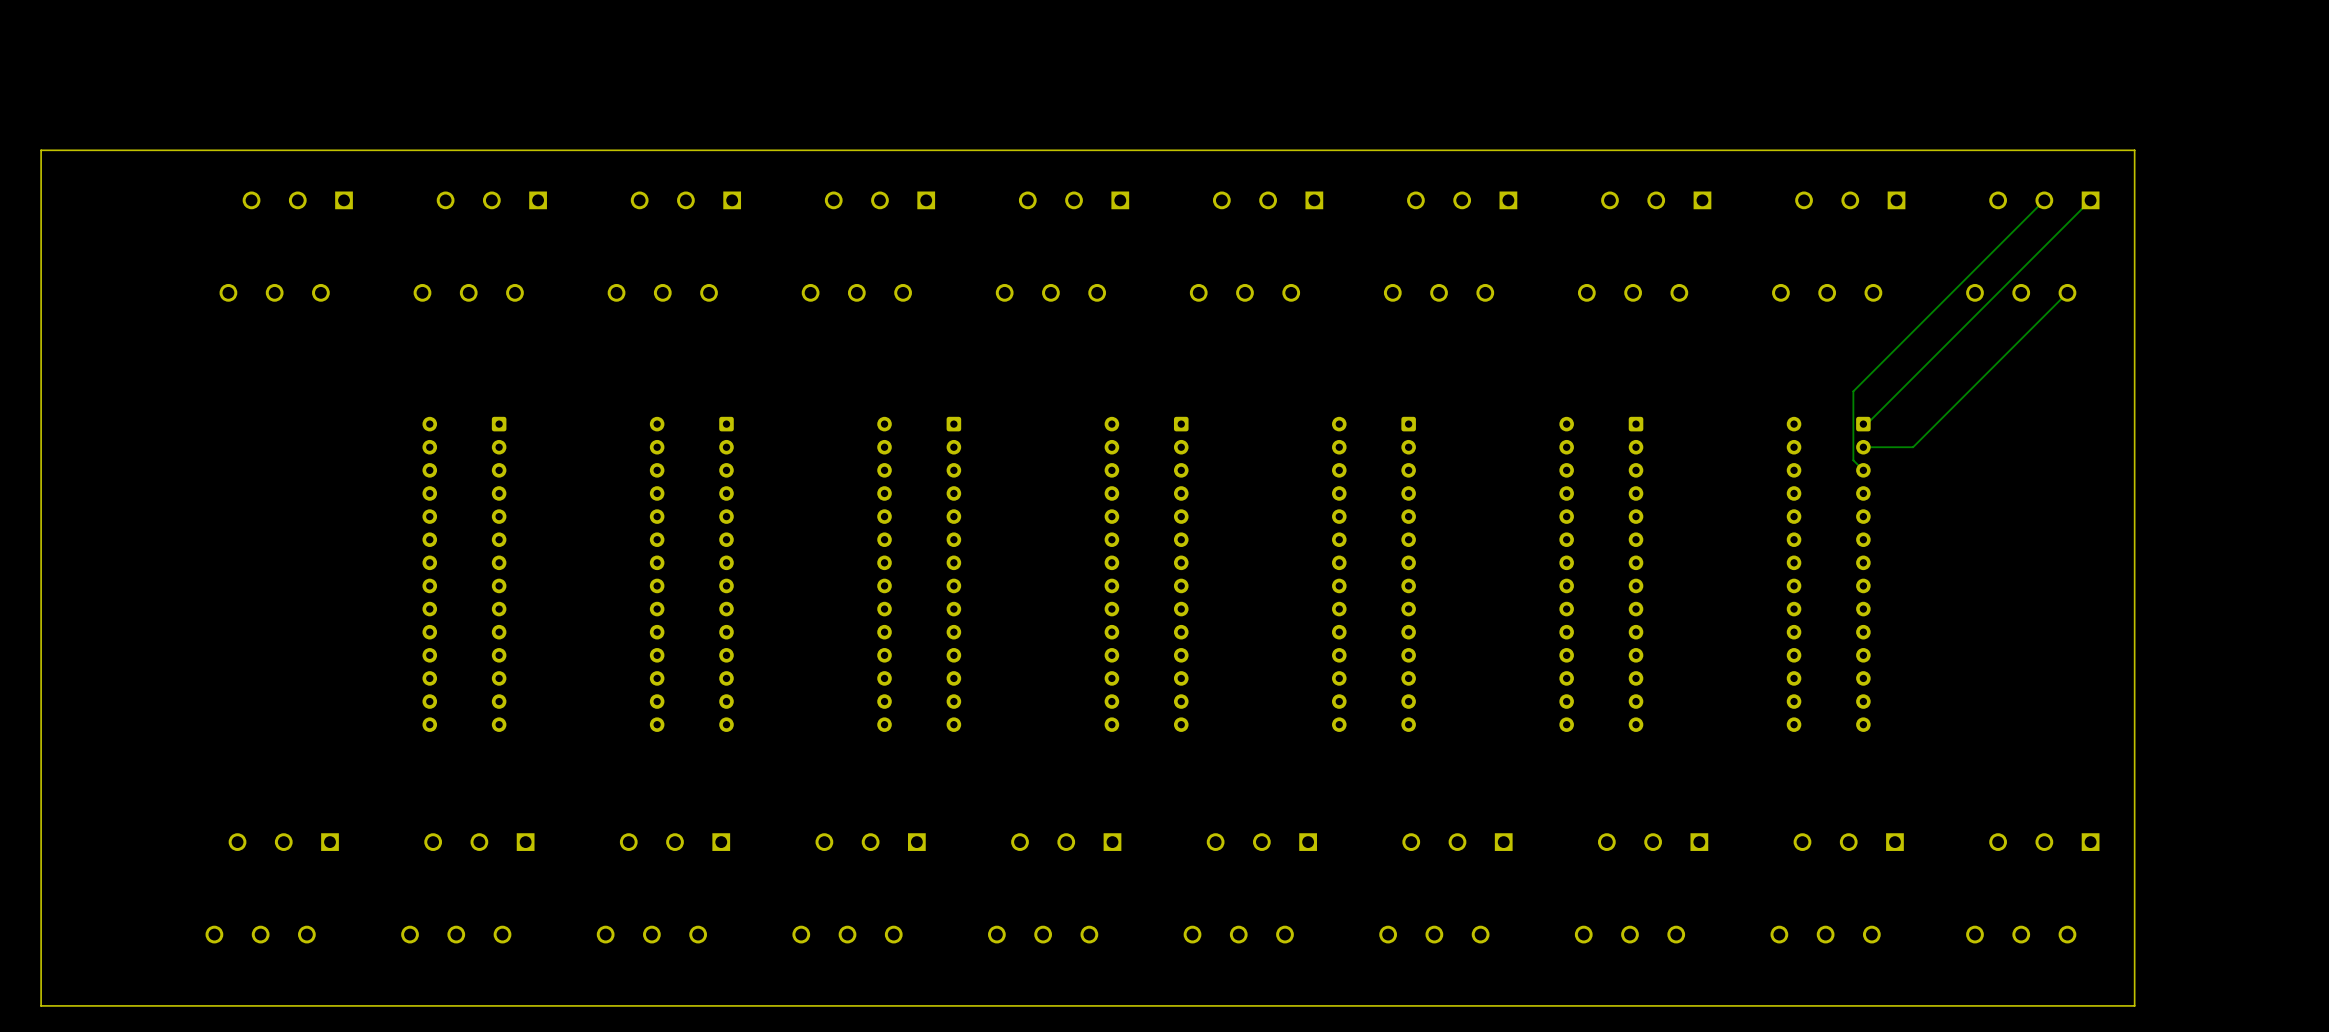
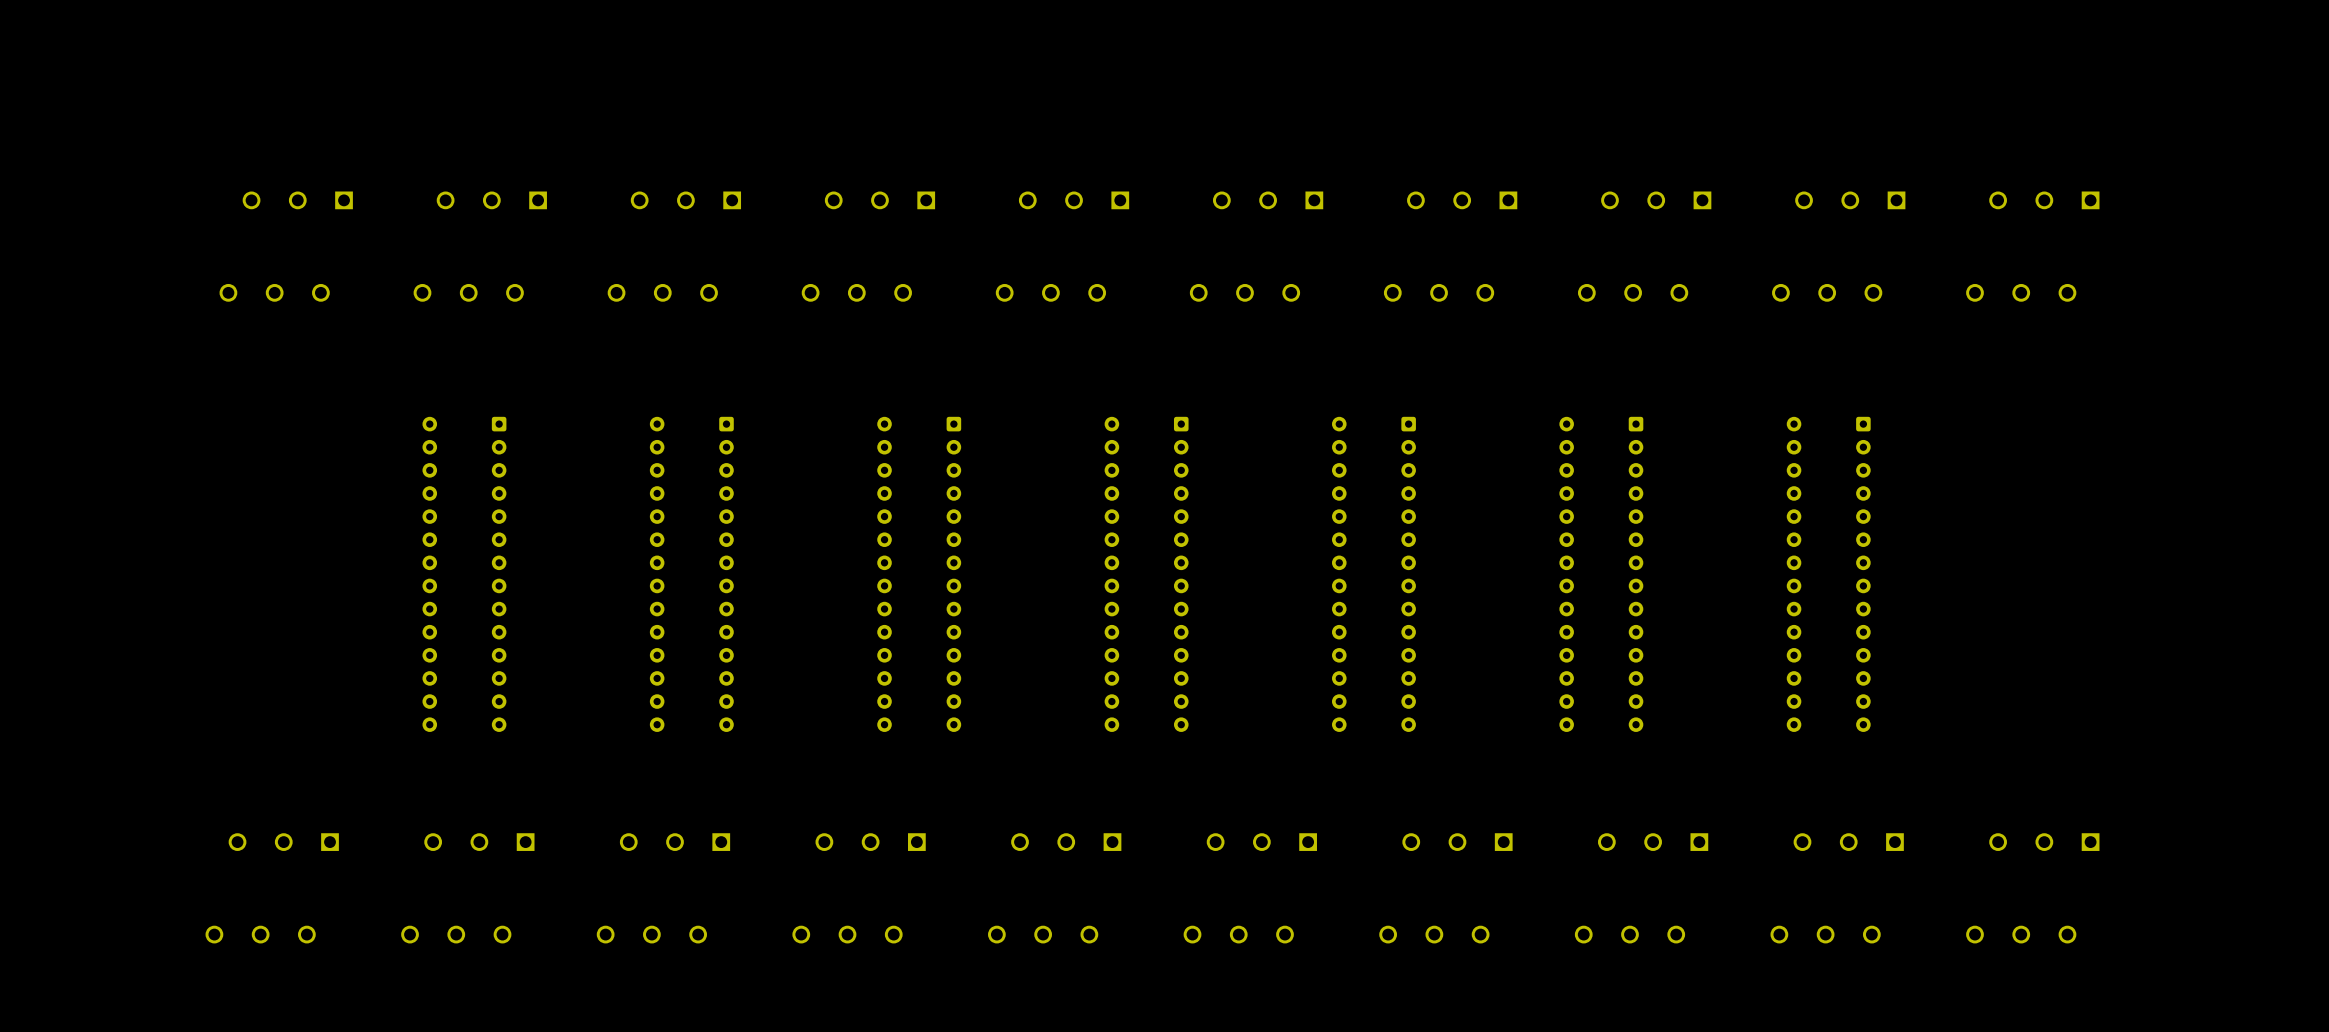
board edge: (2134, 150) (41, 150) (41, 1005) (2134, 1005) (2134, 150) -> none
track: (2044, 200) (1853, 391) (1853, 460) (1863, 470) -> none
track: (2090, 200) (1866, 424) (1863, 424) -> none
track: (2067, 292) (1913, 447) (1863, 447) -> none

